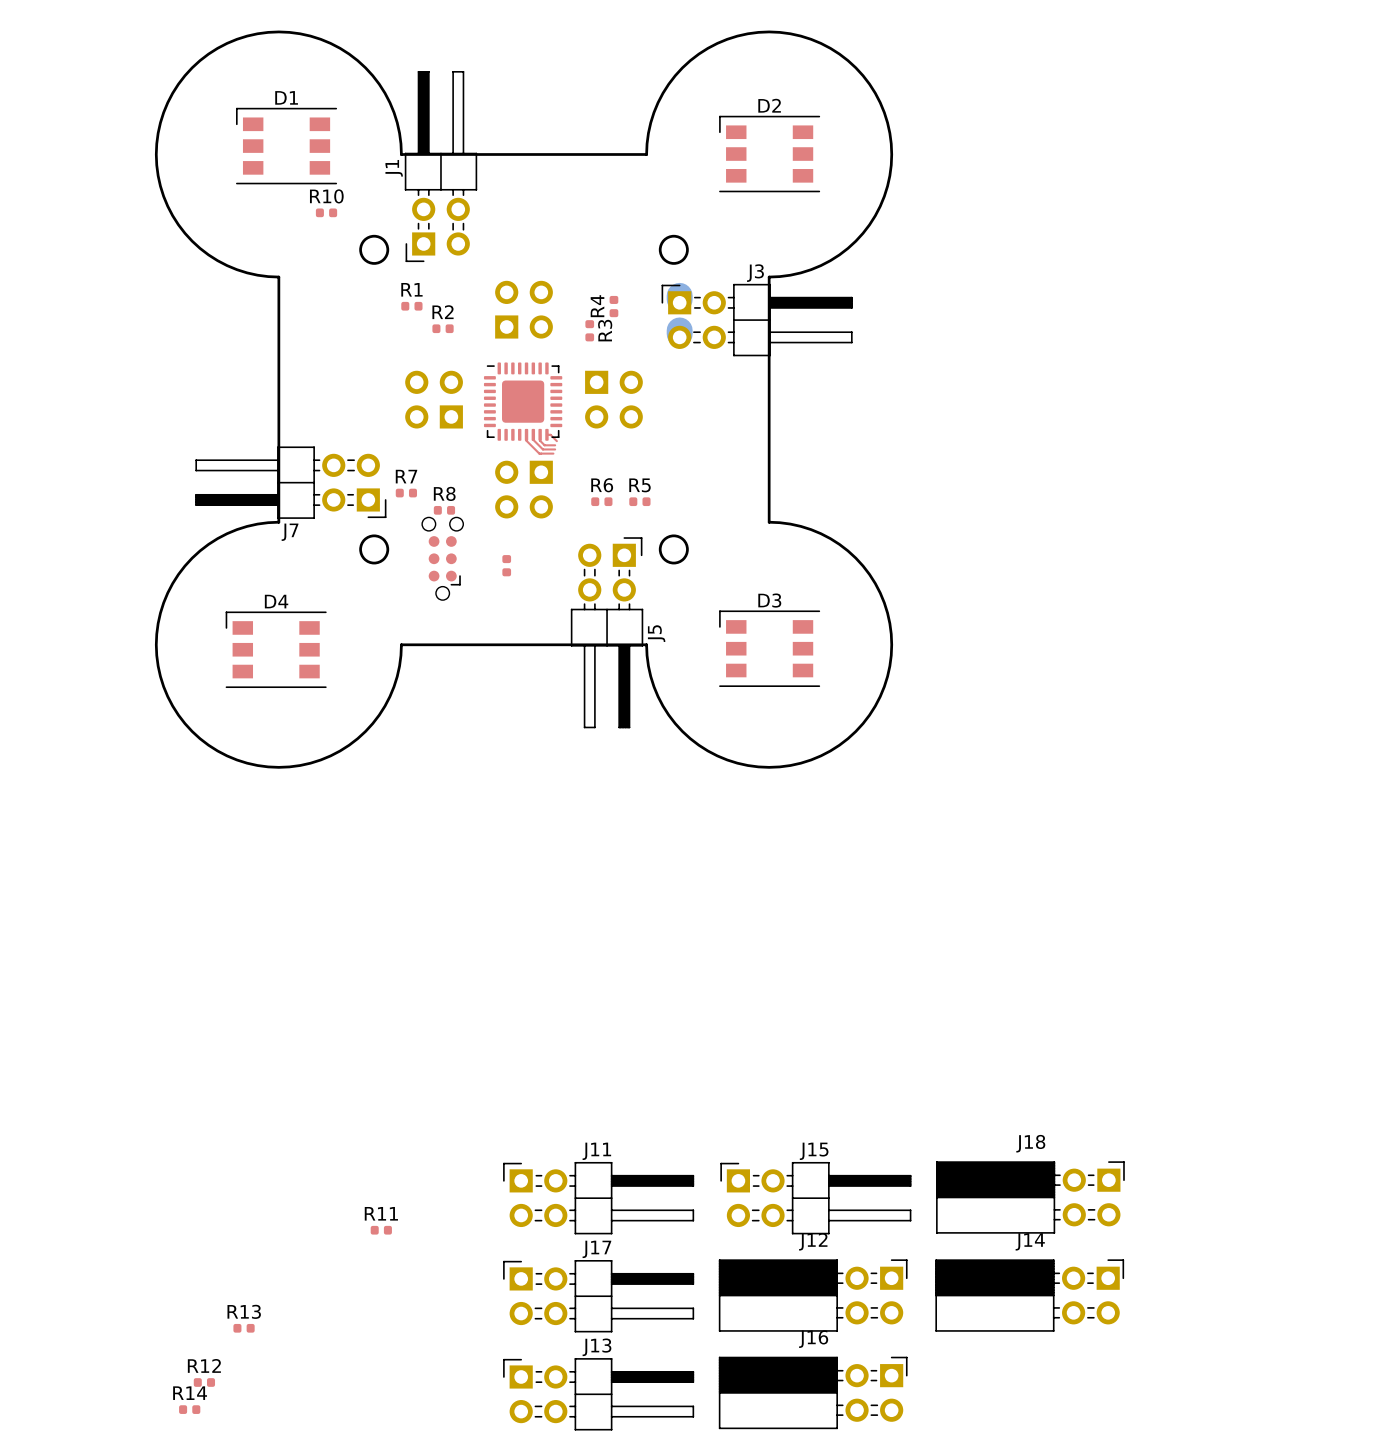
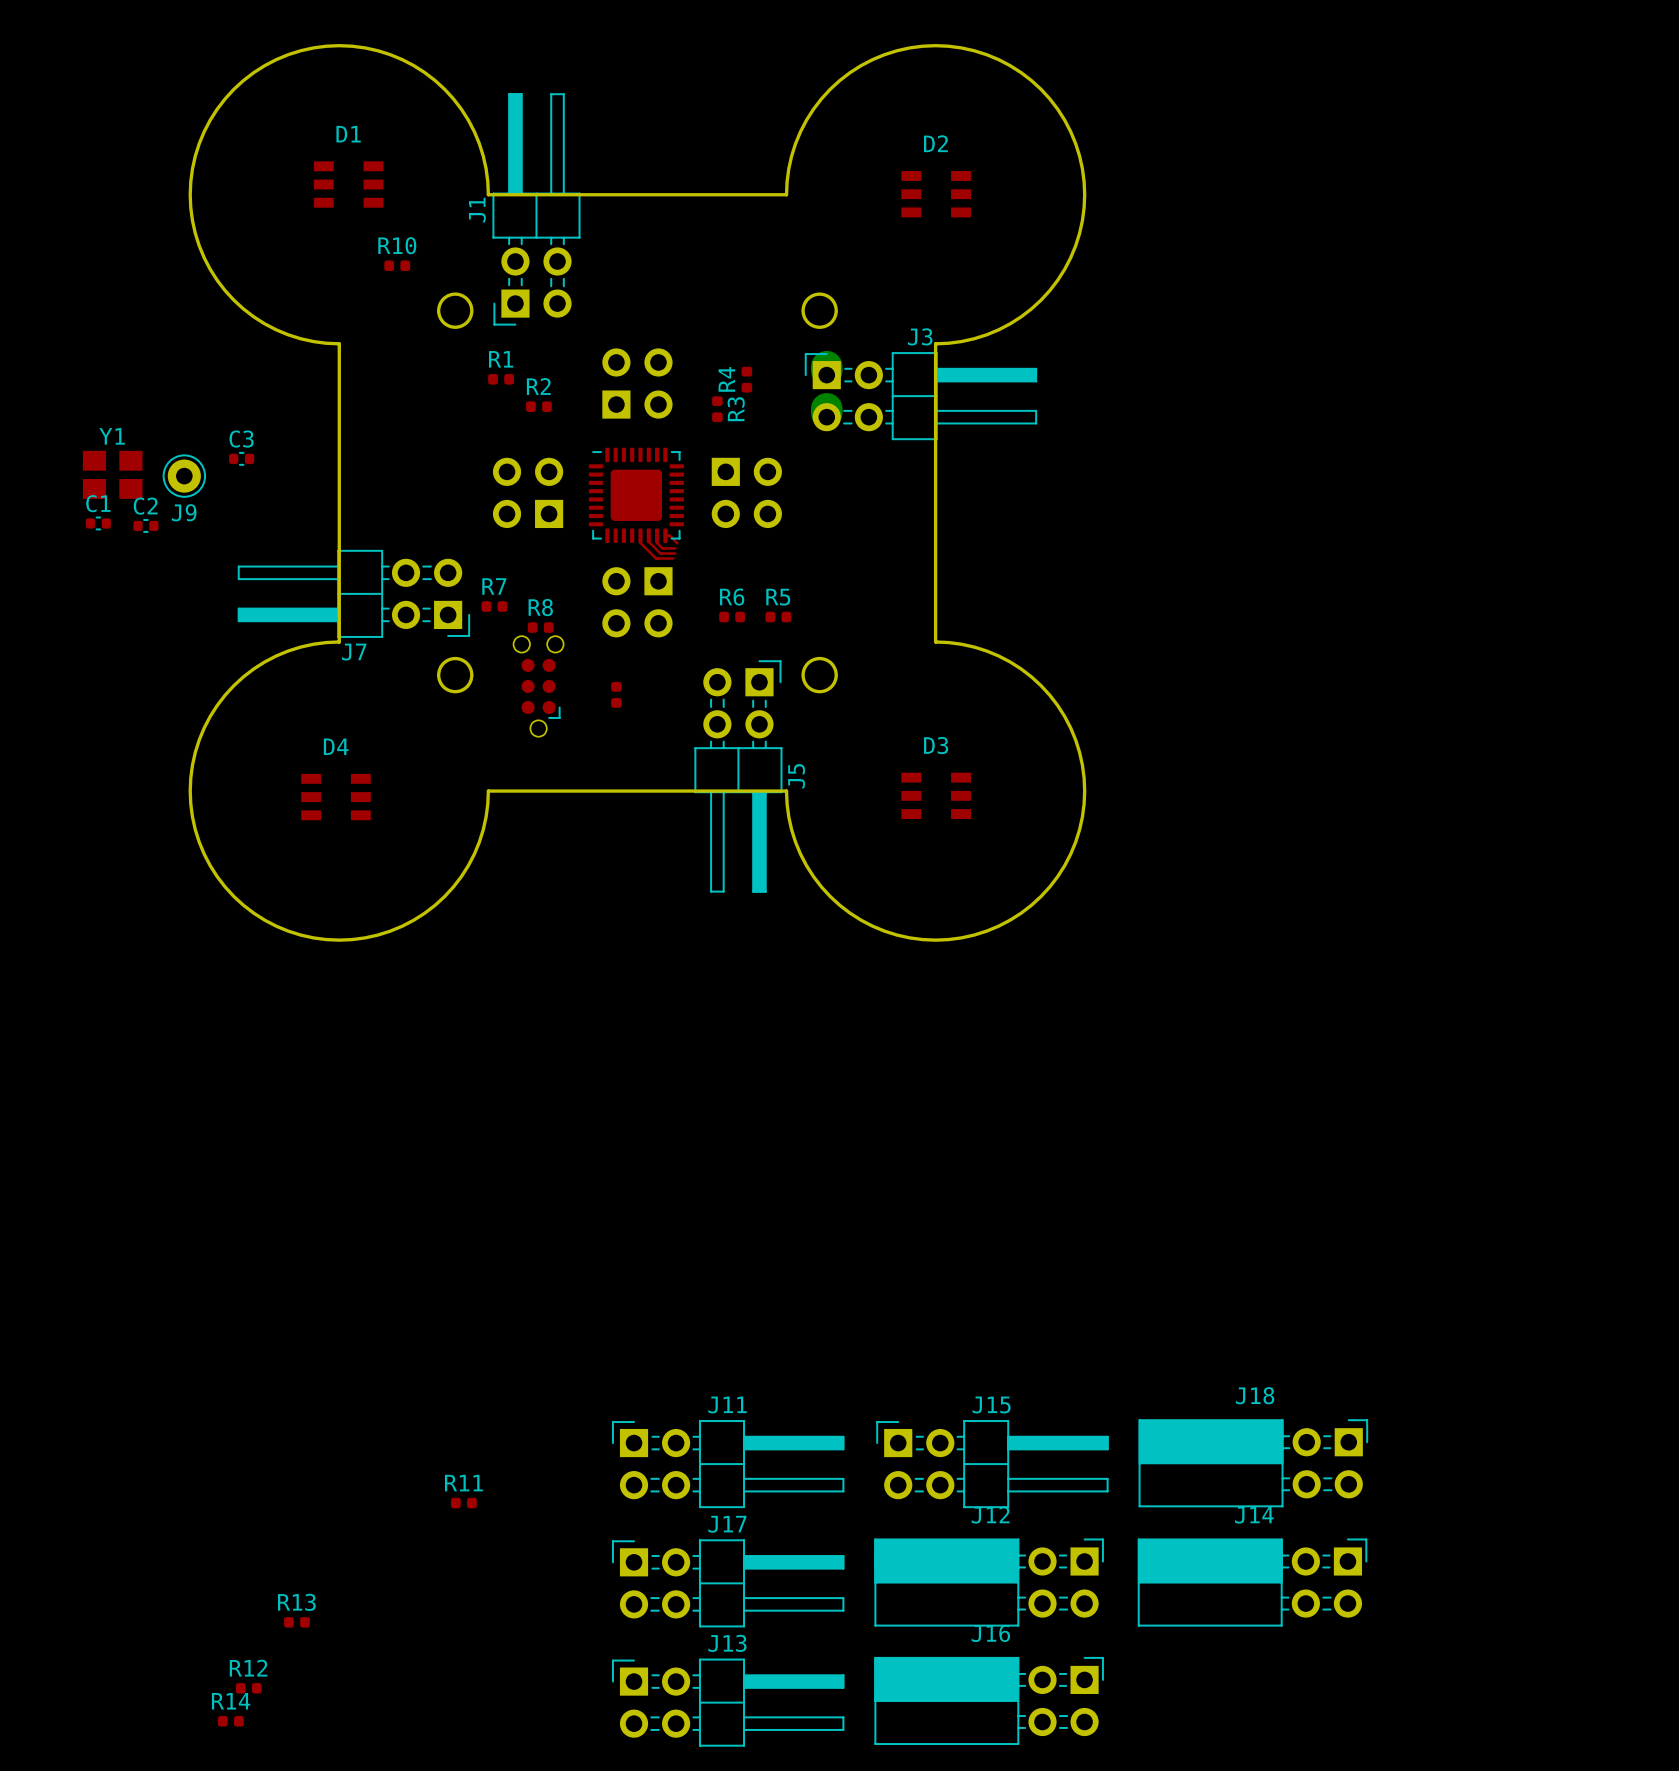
D1 footprint: [236, 107, 338, 185] -> [313, 161, 384, 208]
D2 footprint: [719, 115, 821, 193] -> [901, 170, 971, 218]
C3: none -> (241, 458)
Y1: none -> (112, 474)
J9: none -> (184, 476)
C1: none -> (98, 523)
C2: none -> (145, 525)
D3 footprint: [719, 610, 821, 687] -> [901, 772, 971, 820]
D4 footprint: [225, 611, 327, 689] -> [301, 773, 371, 821]

